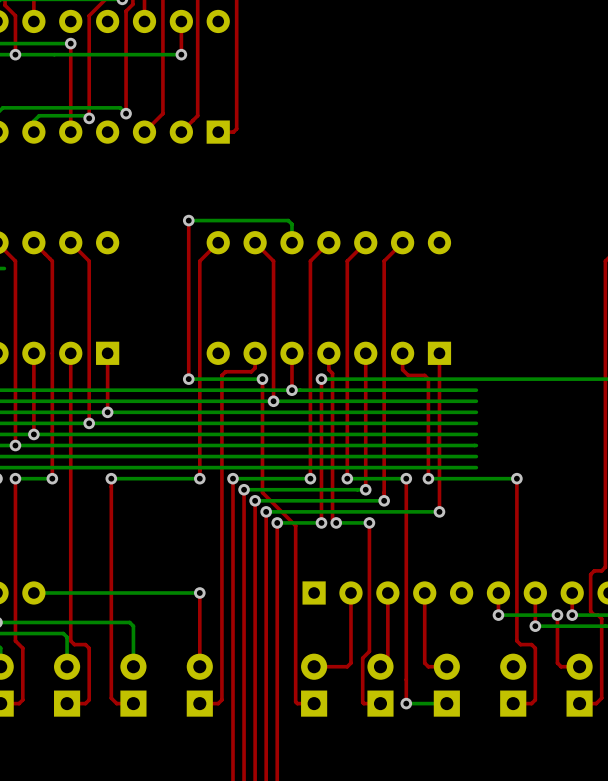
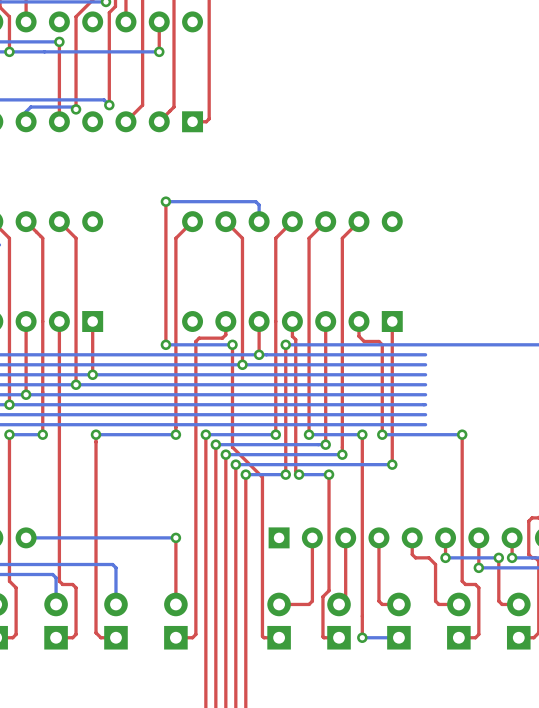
top track: none -> (412, 537) (412, 554) (415, 557) (428, 557) (435, 564) (435, 601) (438, 604) (458, 604)

